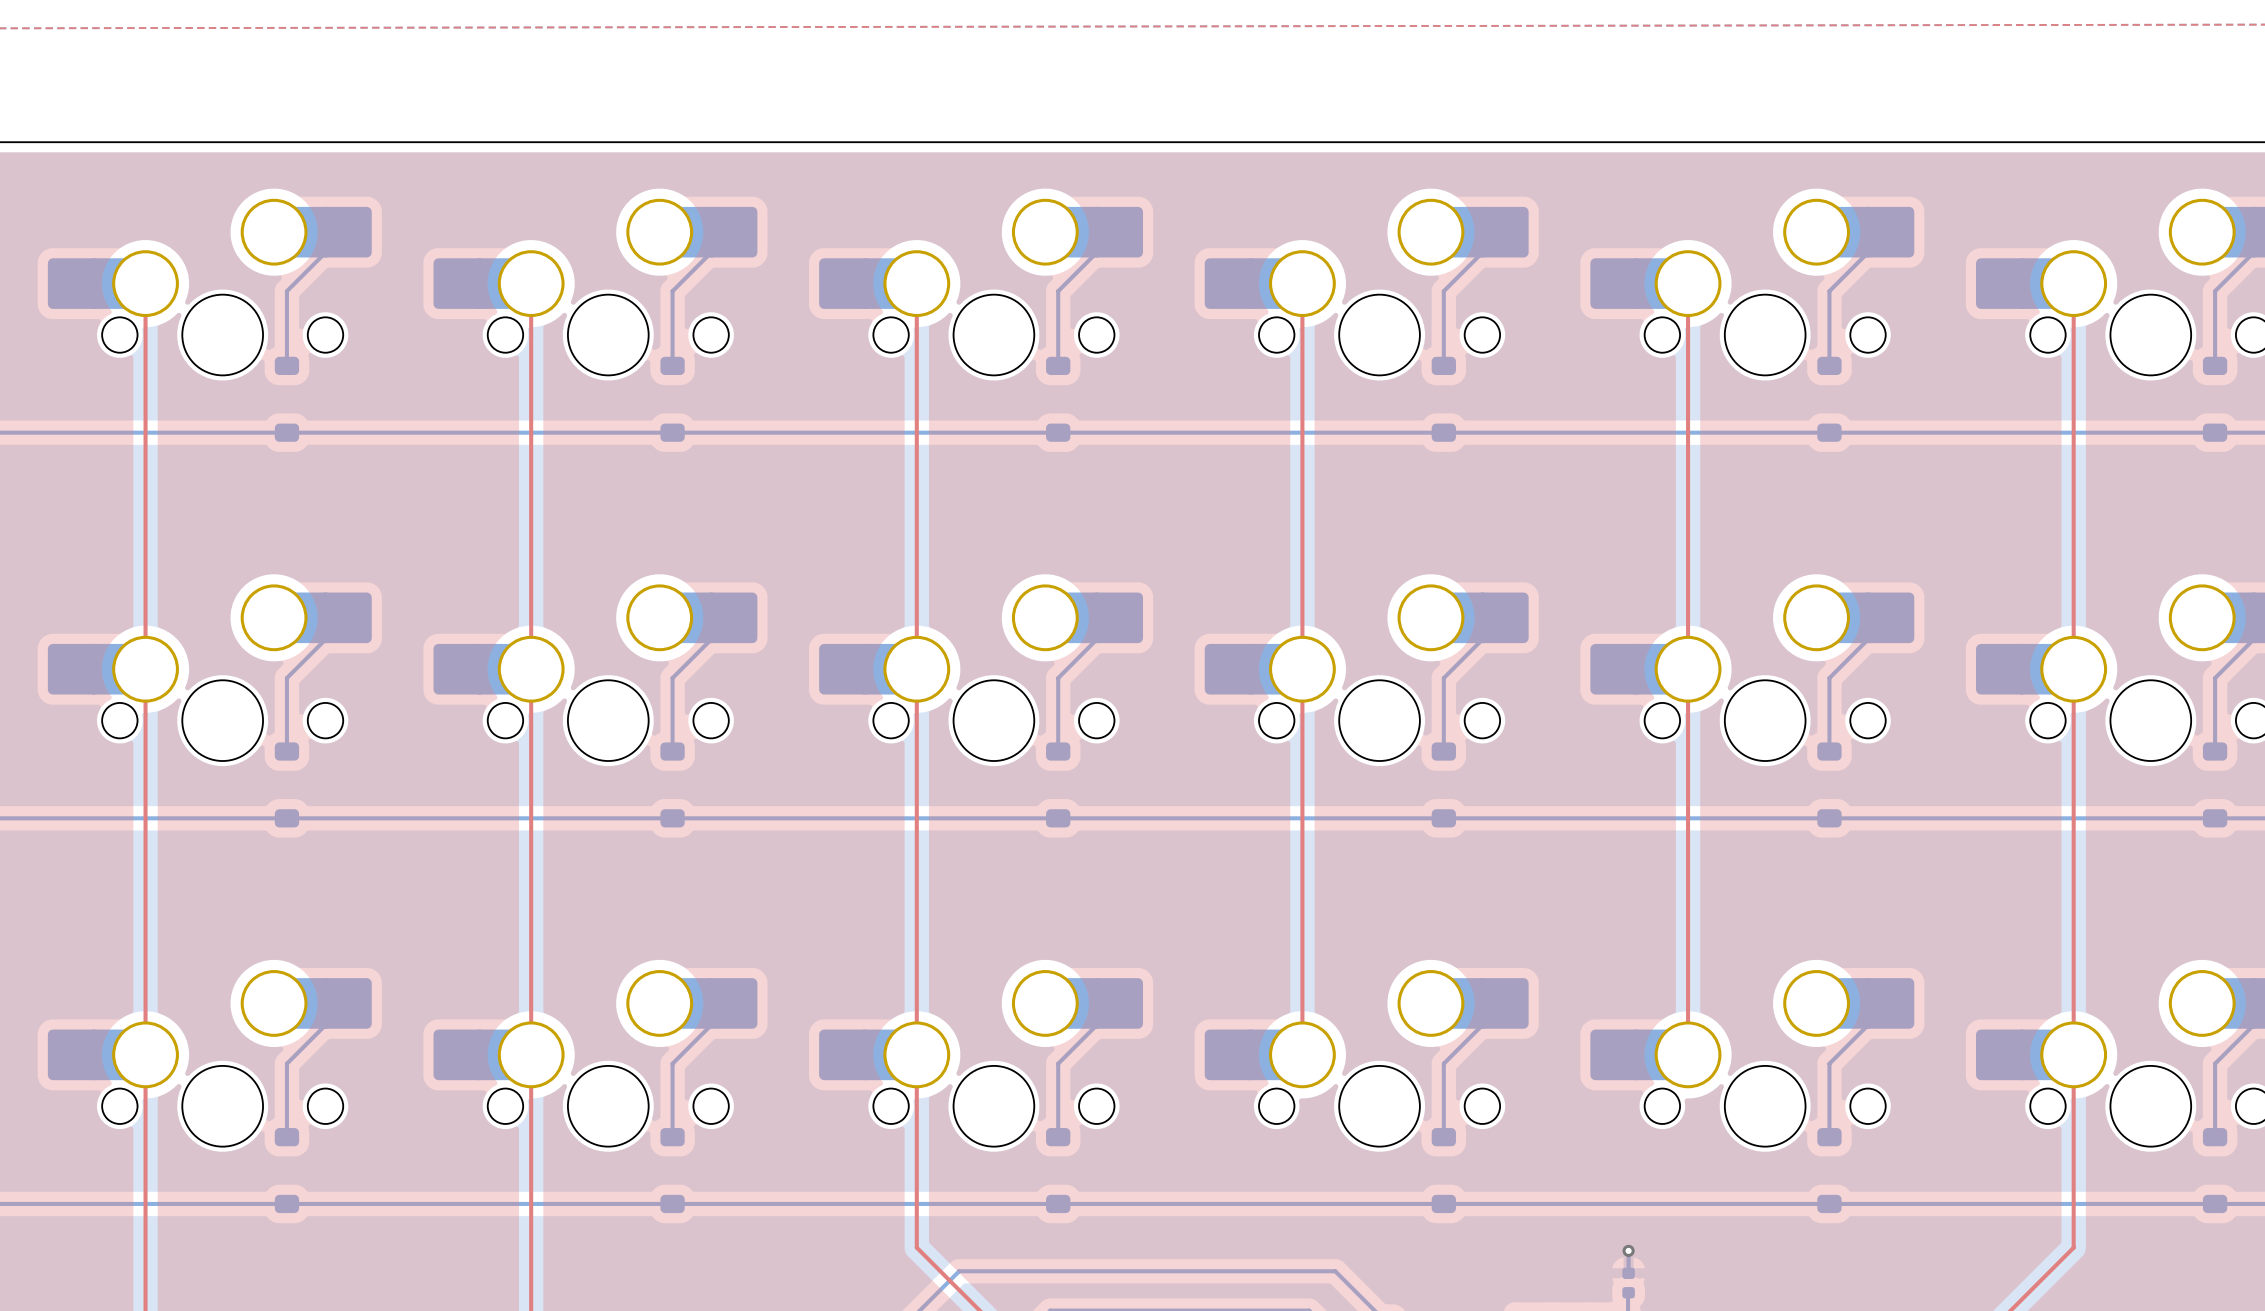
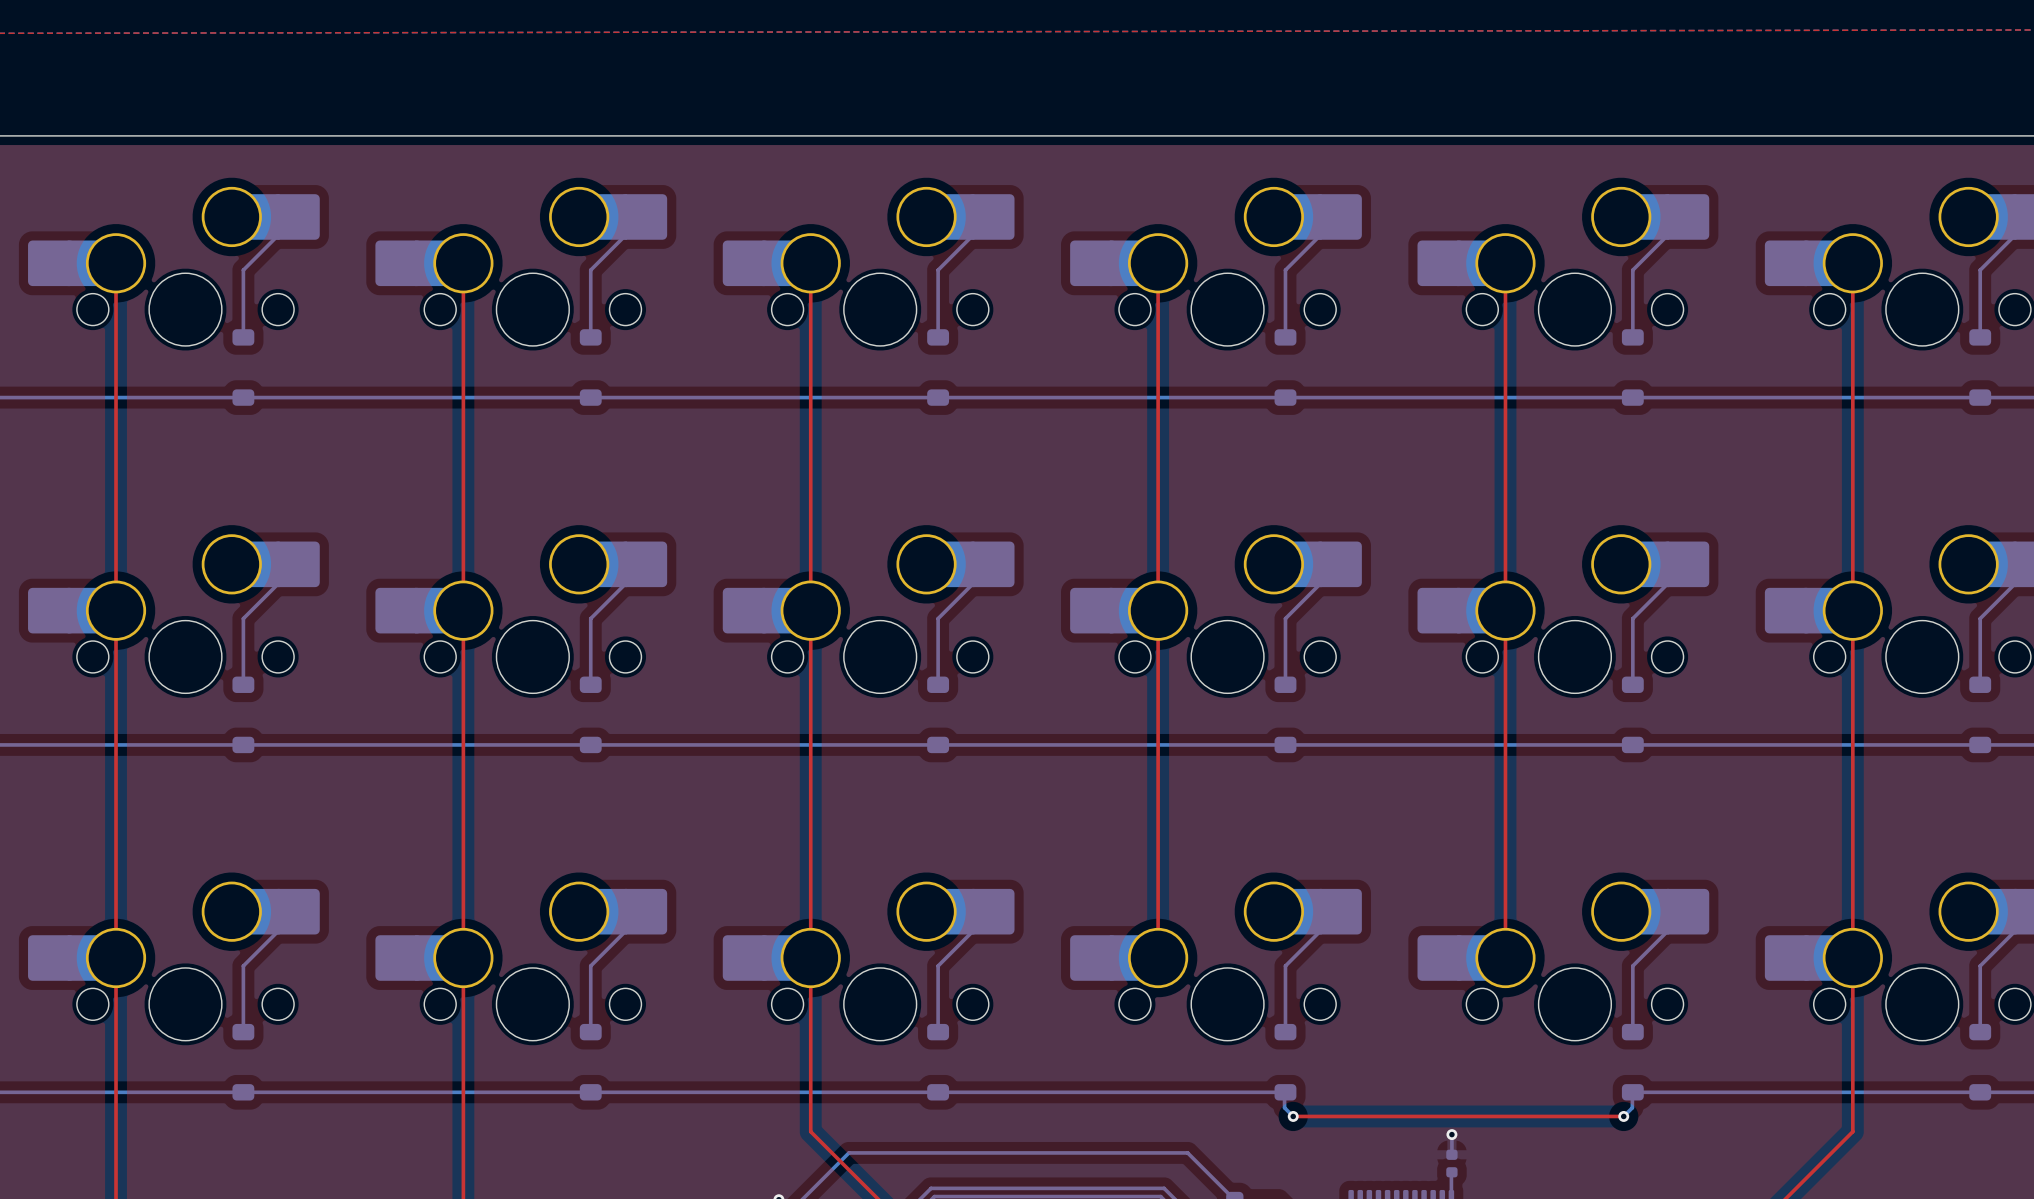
bottom track: none -> (1284, 1092) (1284, 1107) (1293, 1116)
bottom track: (1443, 1203) (1829, 1203) -> (1623, 1116) (1632, 1107) (1632, 1092)
top track: none -> (1293, 1116) (1623, 1116)
via: none -> (1293, 1116)
via: none -> (1623, 1116)

